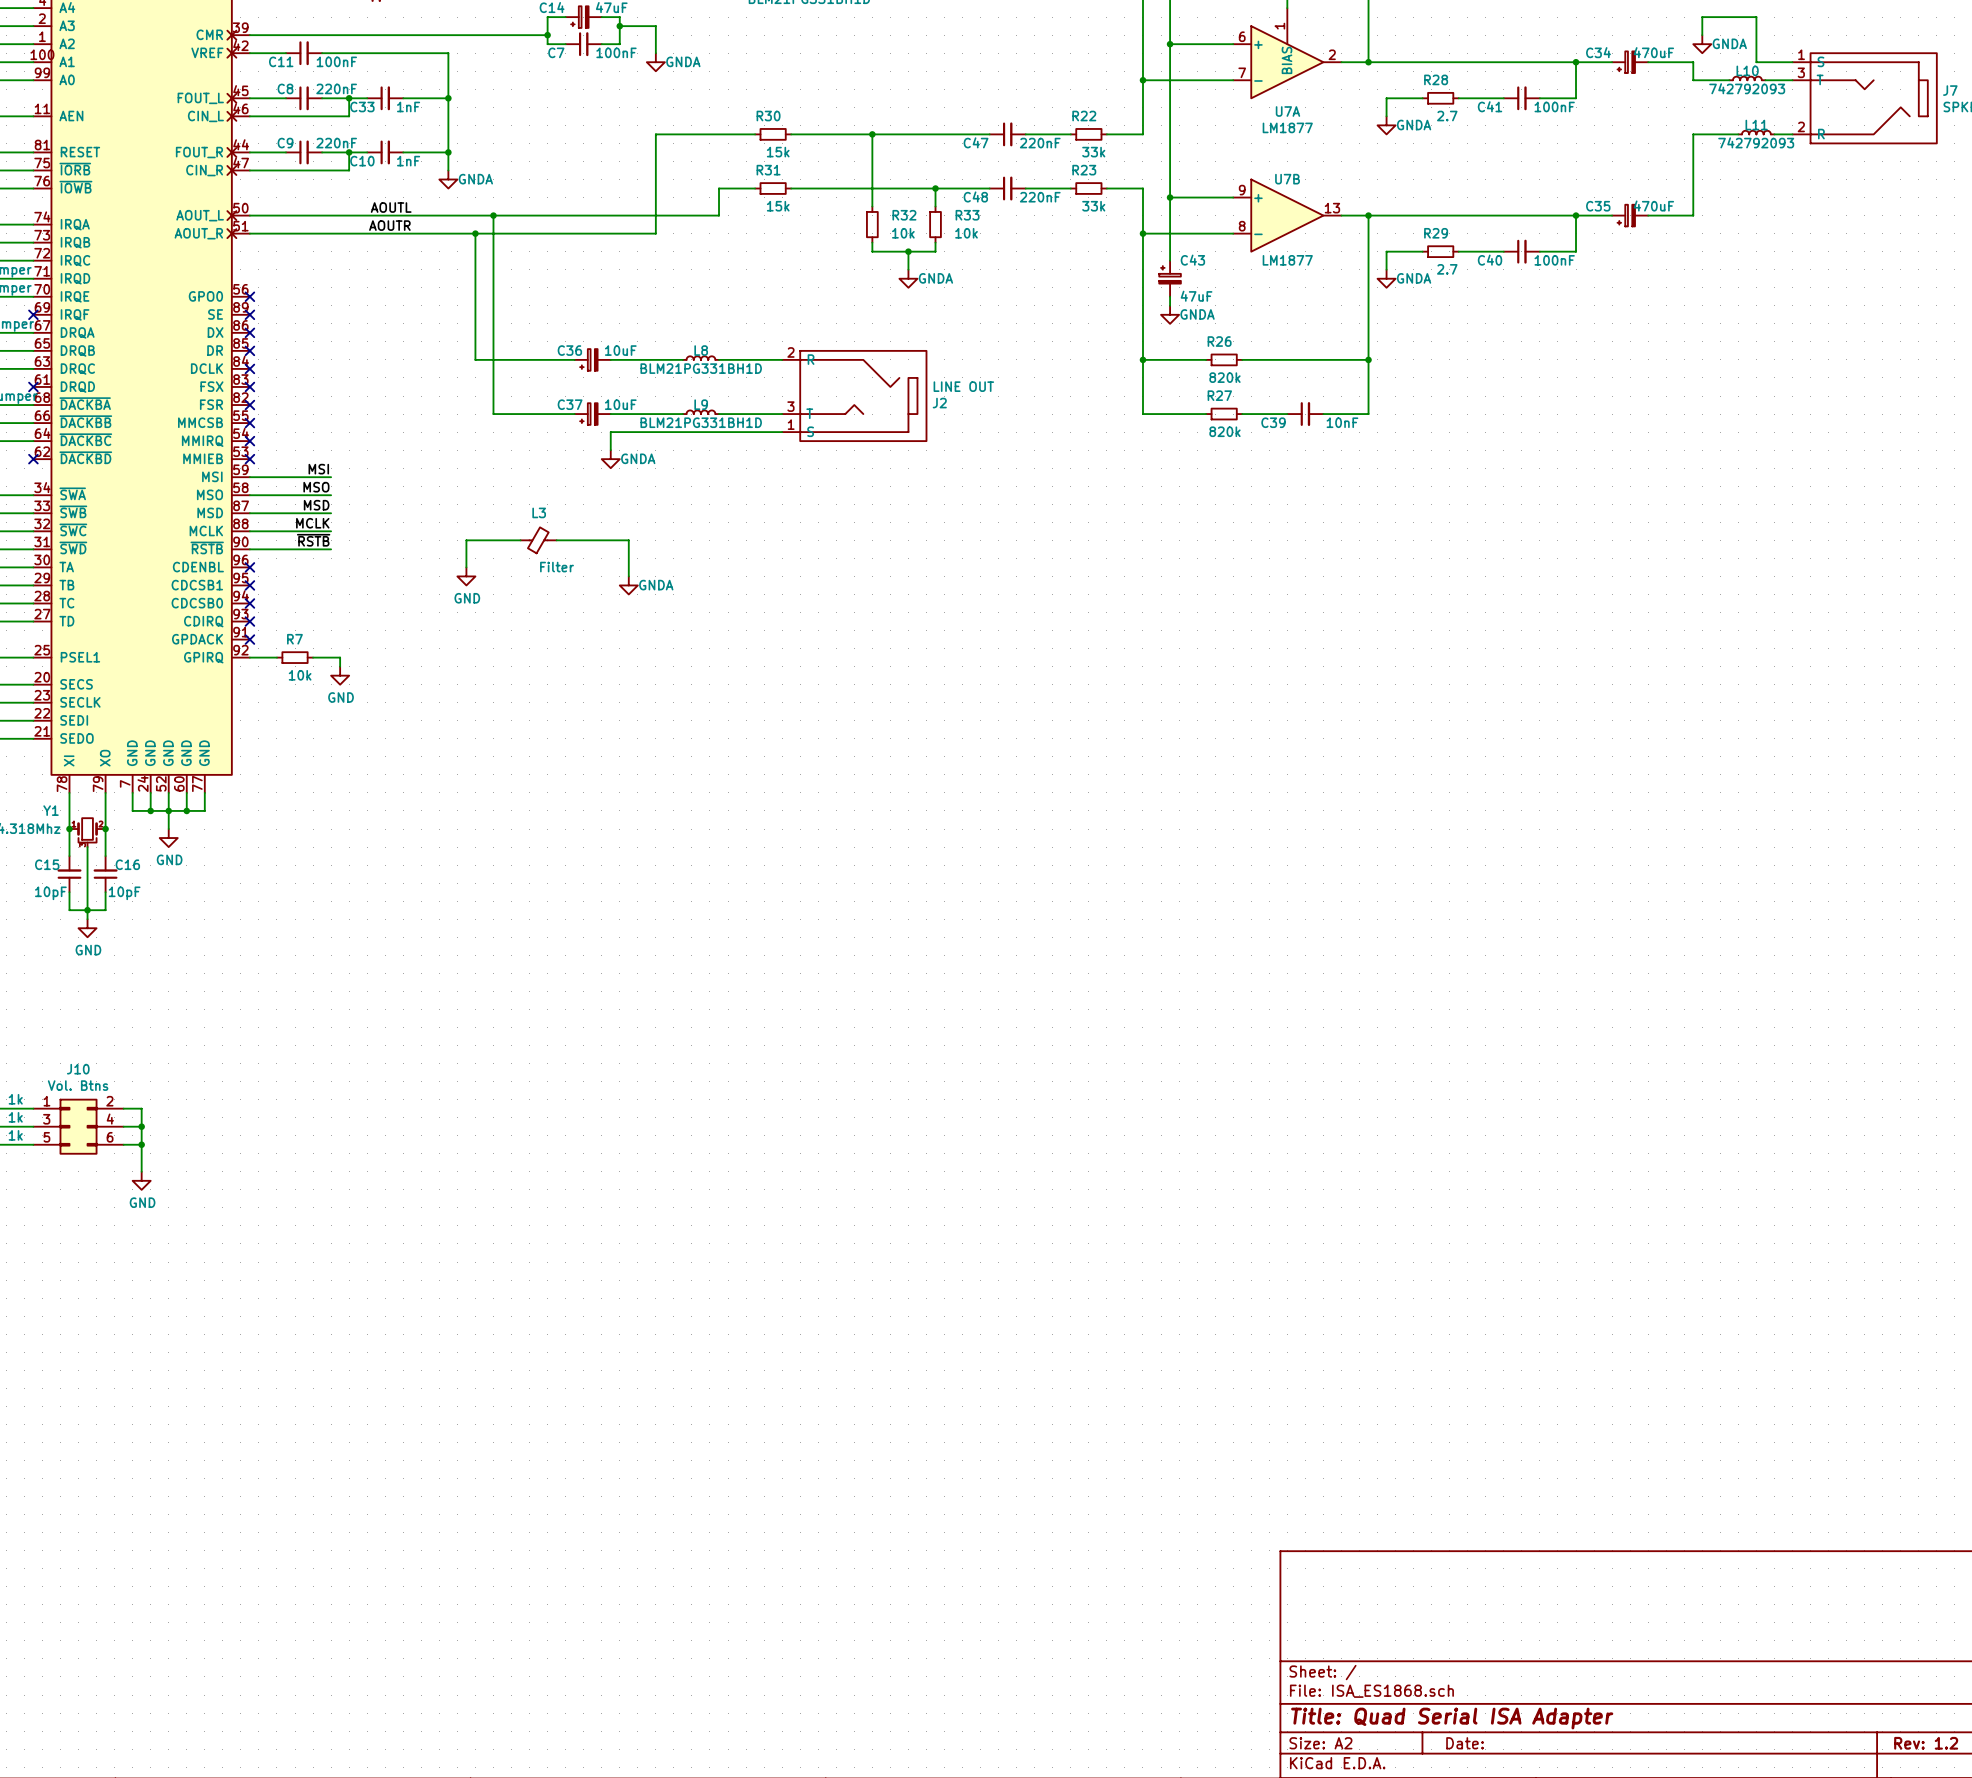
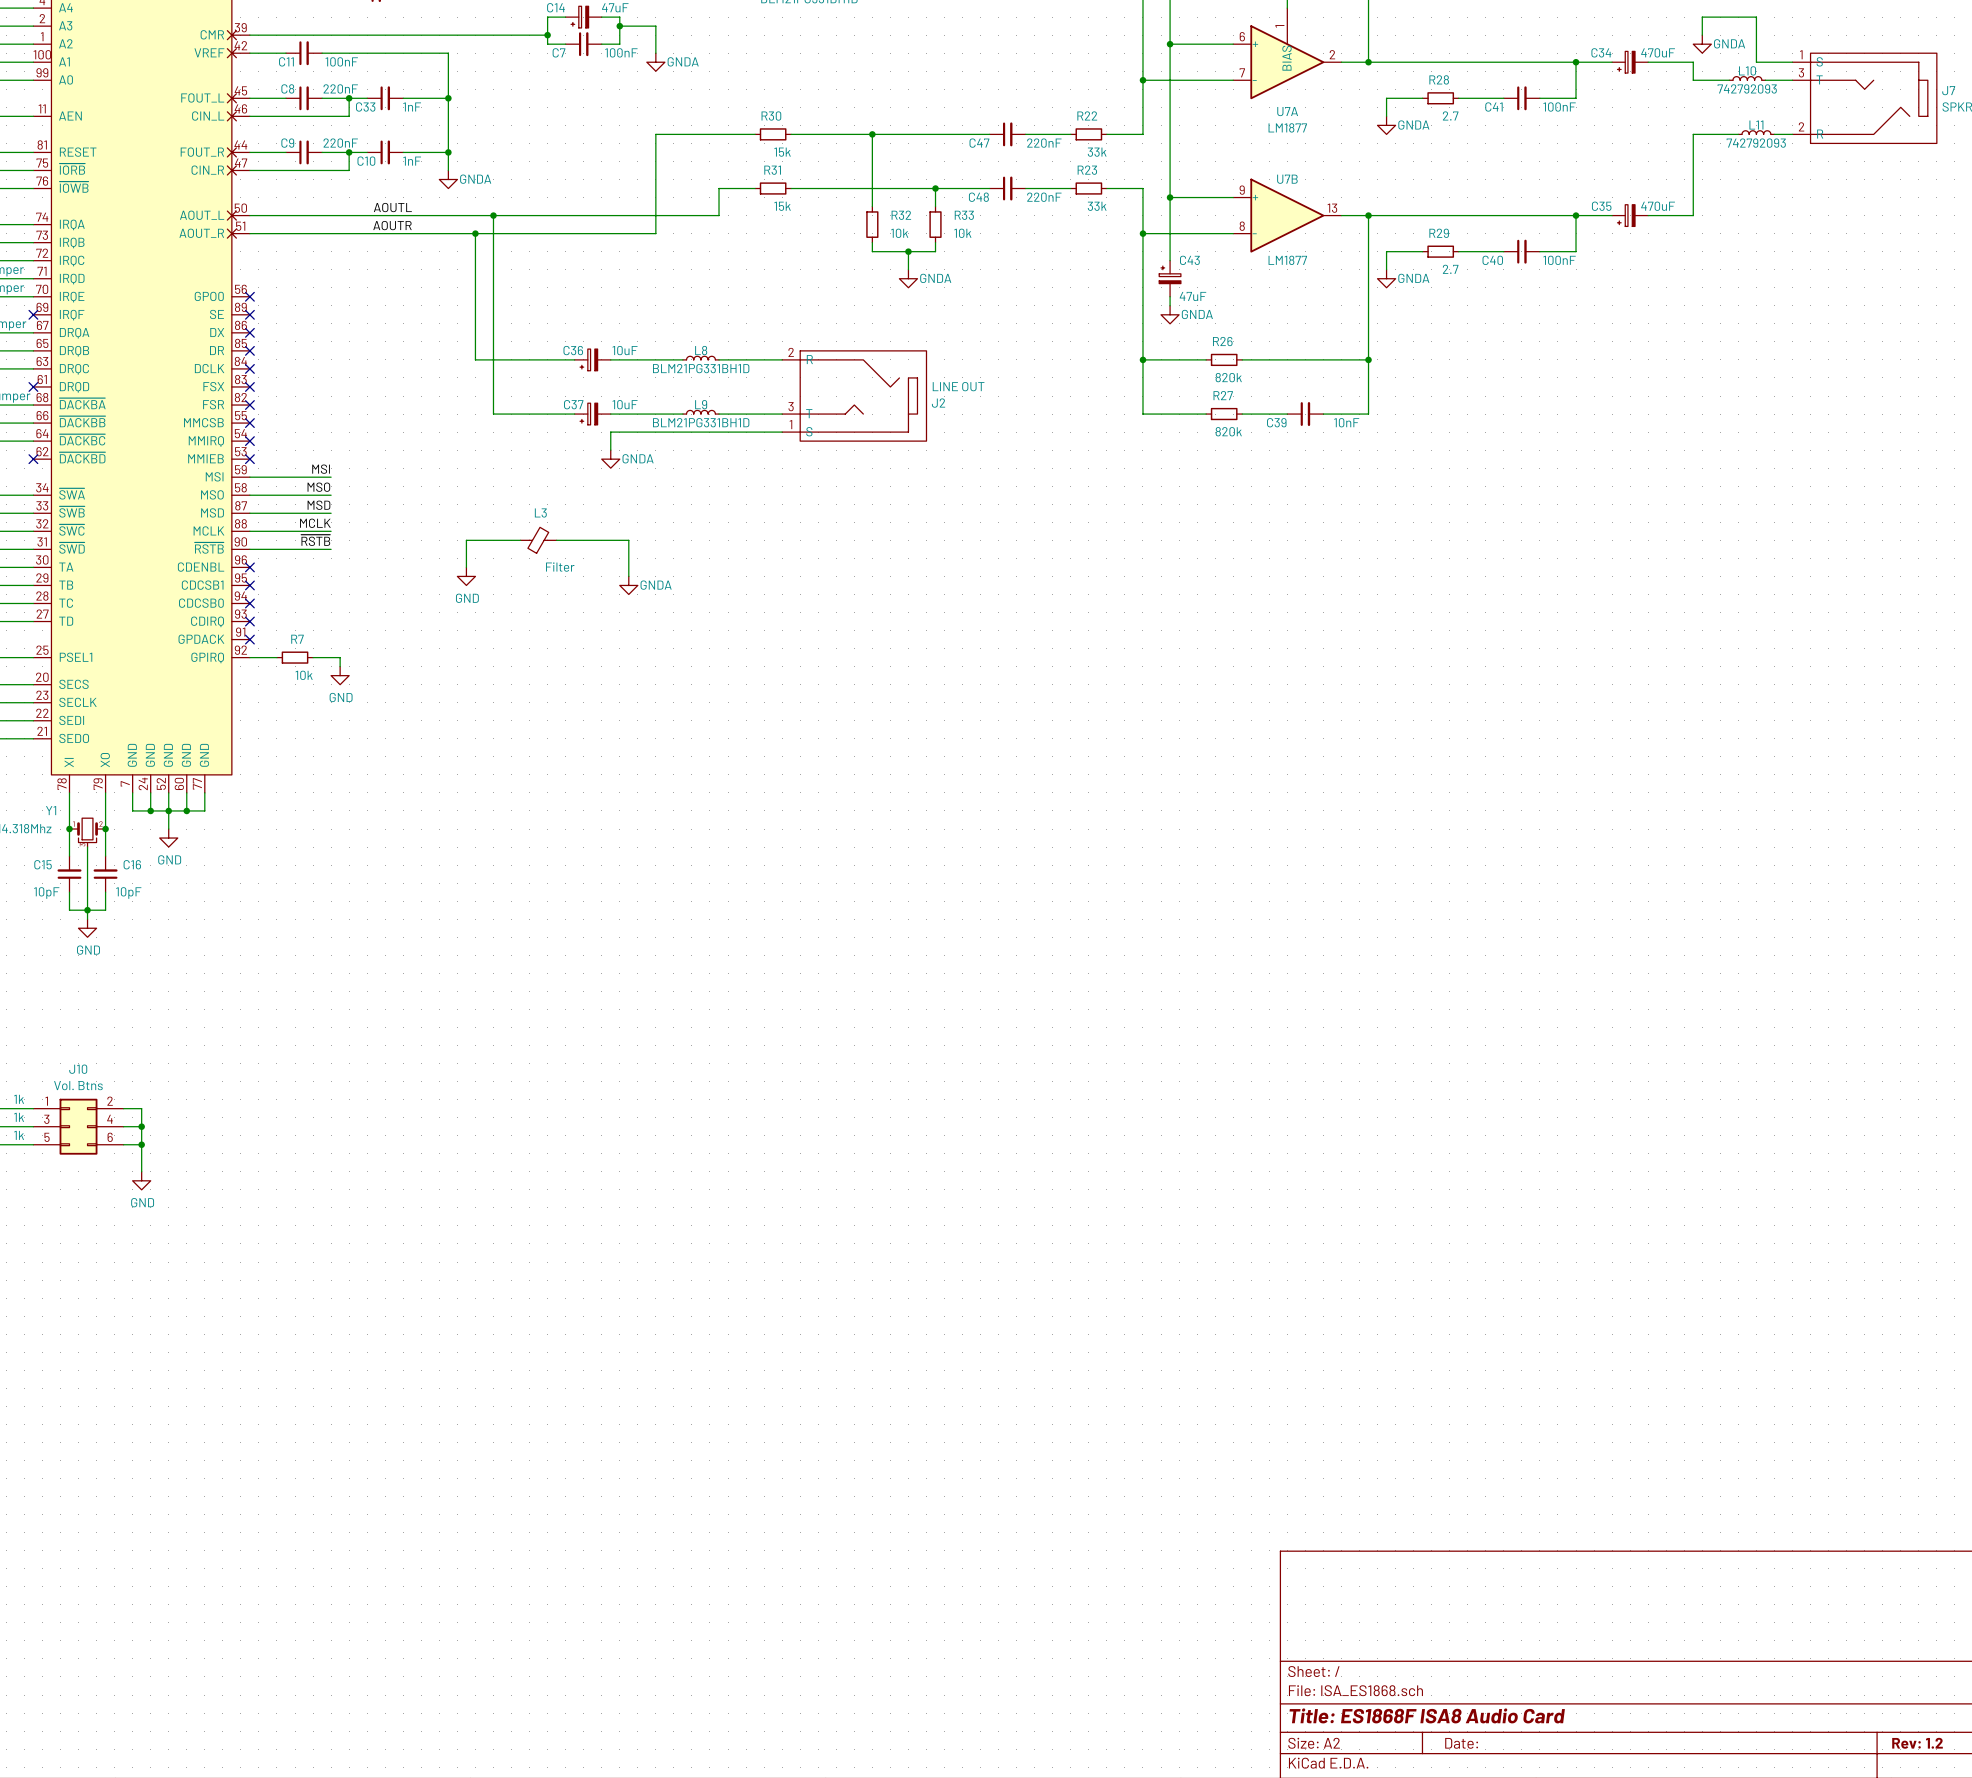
title block: Title: Quad Serial ISA Adapter (1452, 1718) -> Title: ES1868F ISA8 Audio Card (1427, 1715)

